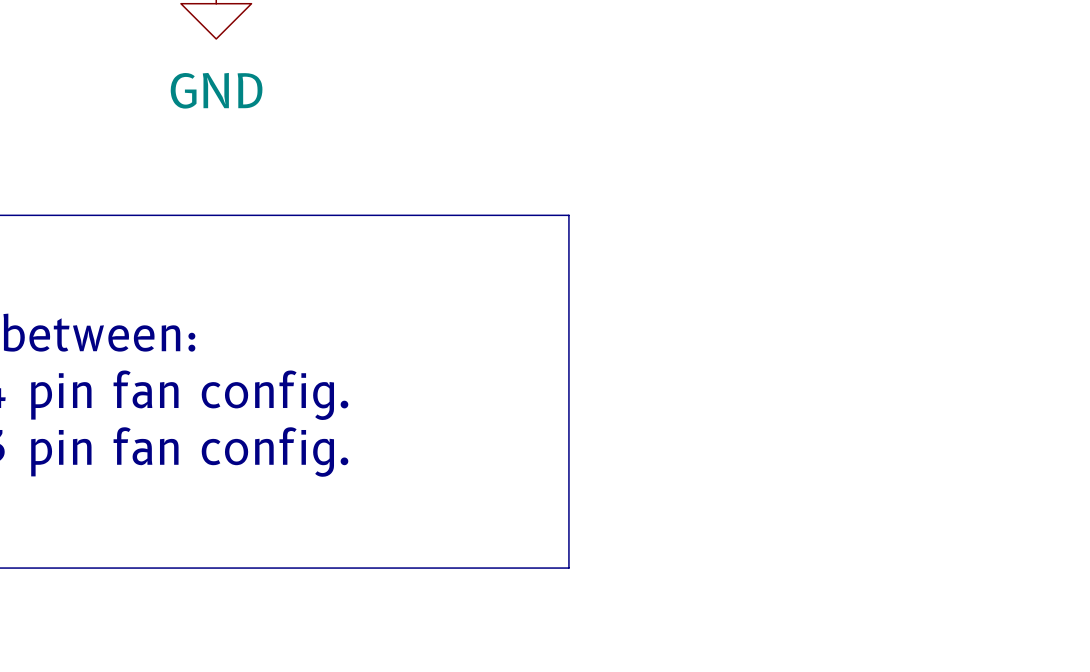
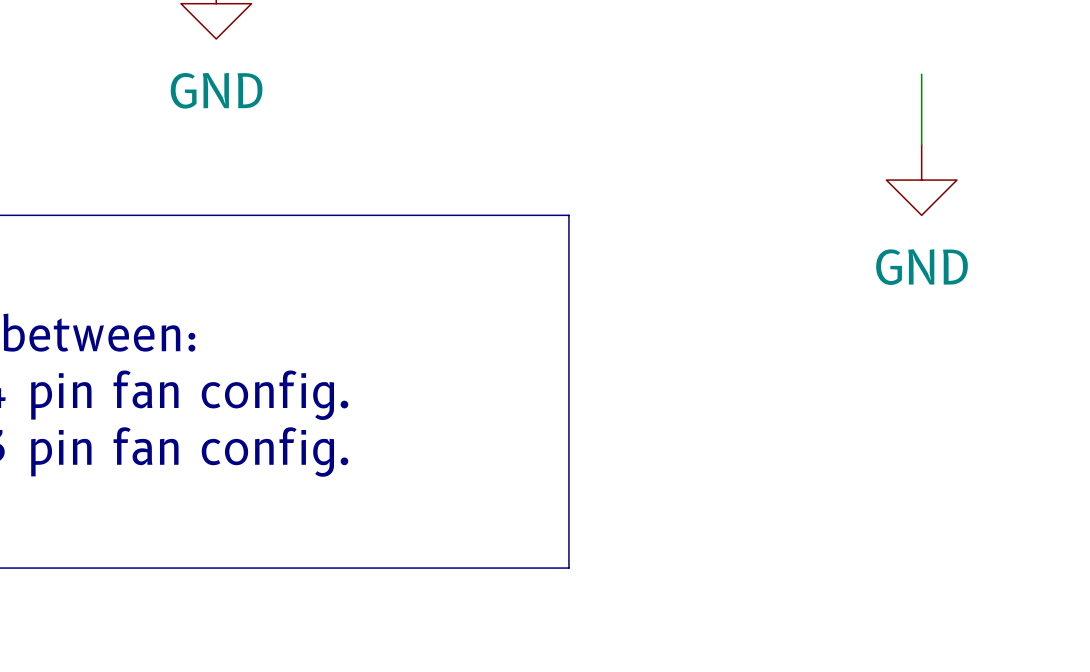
wire: none -> (921, 74) (921, 144)
power symbol: none -> GND (921, 180)

